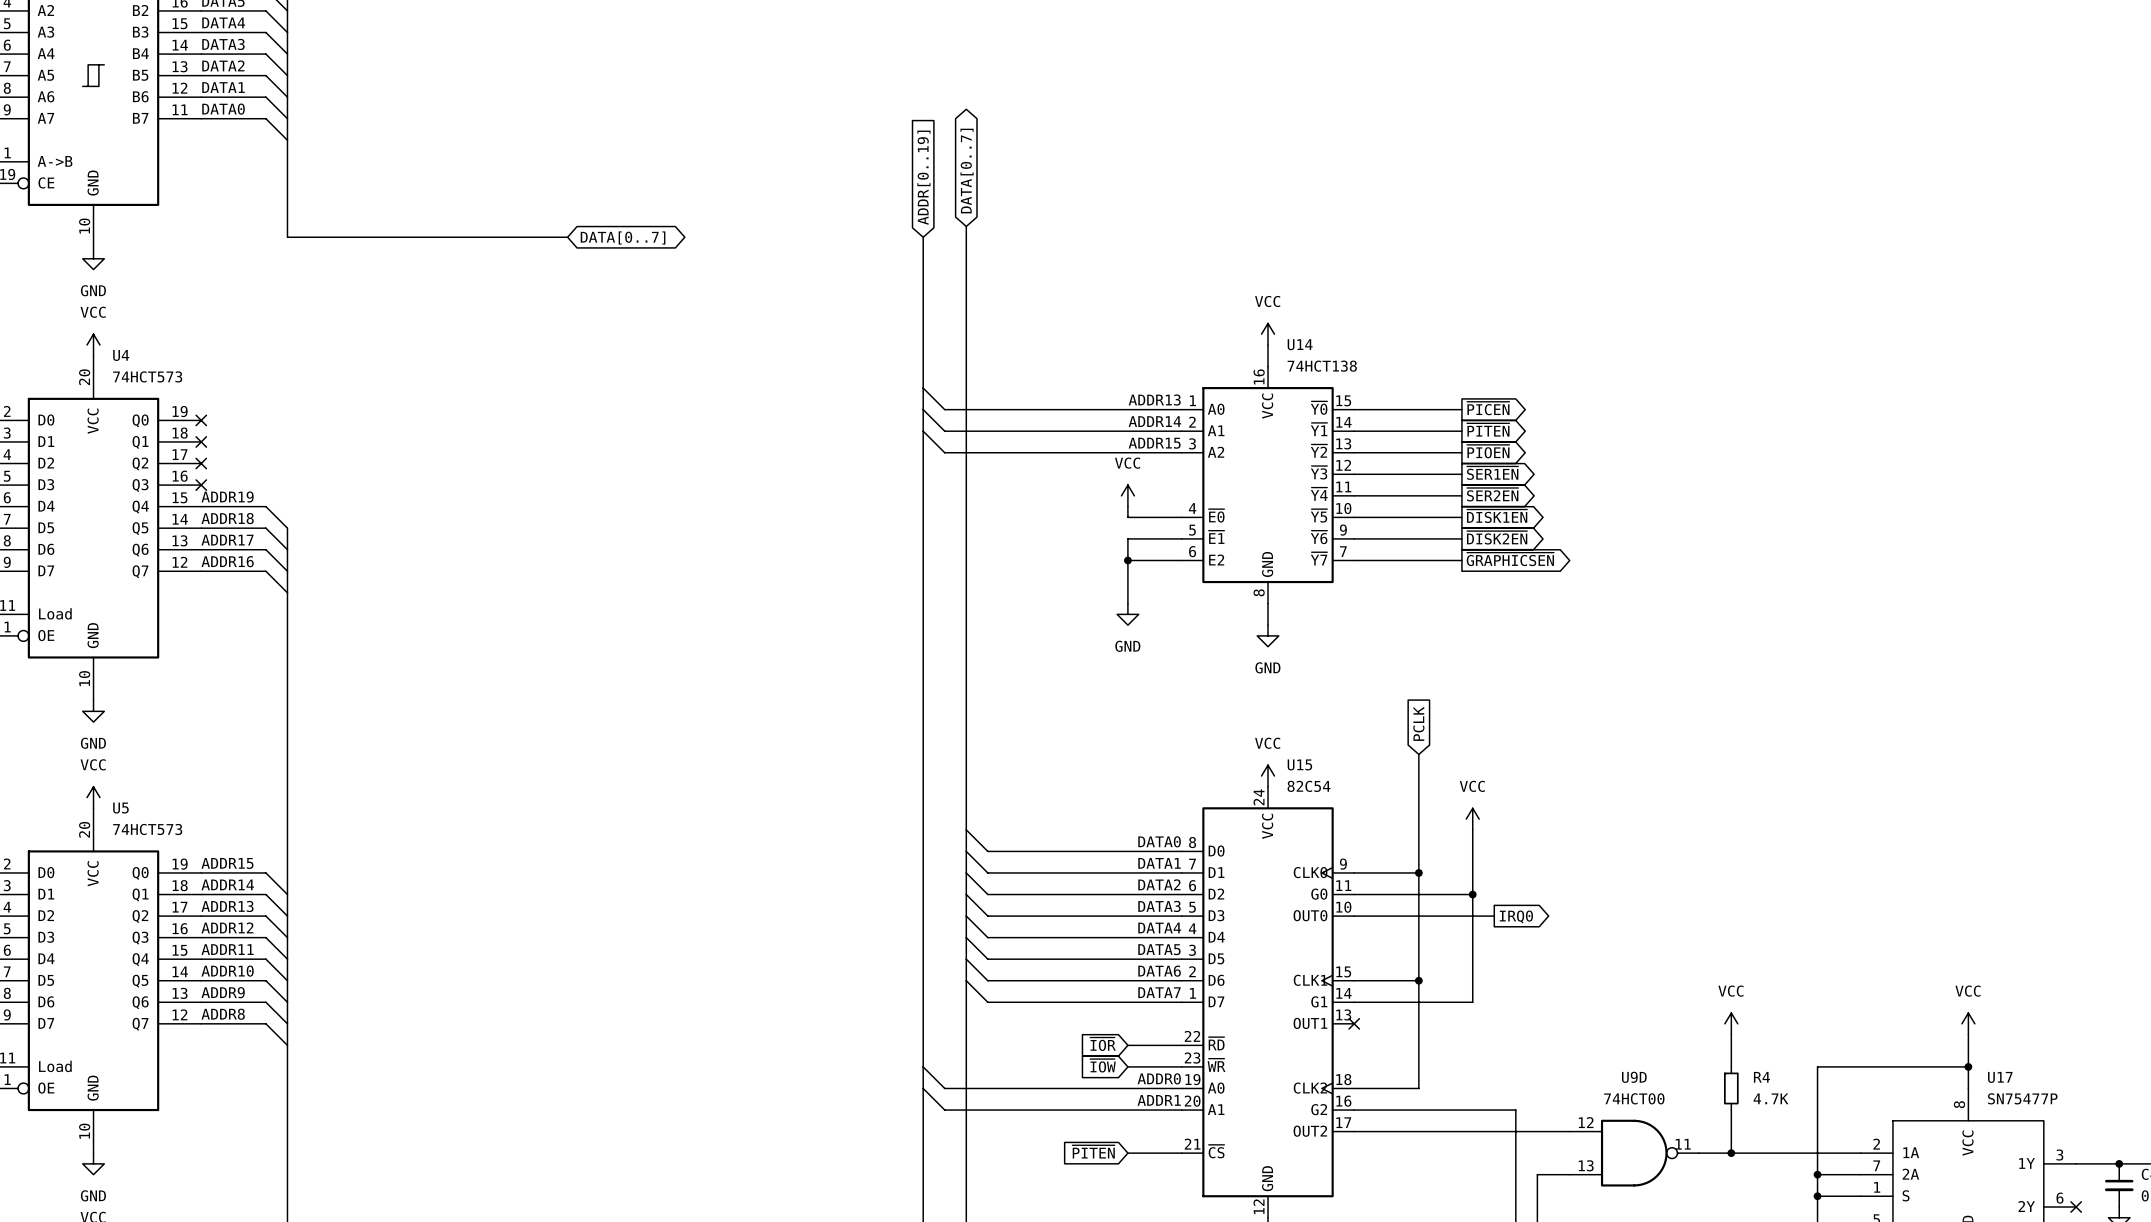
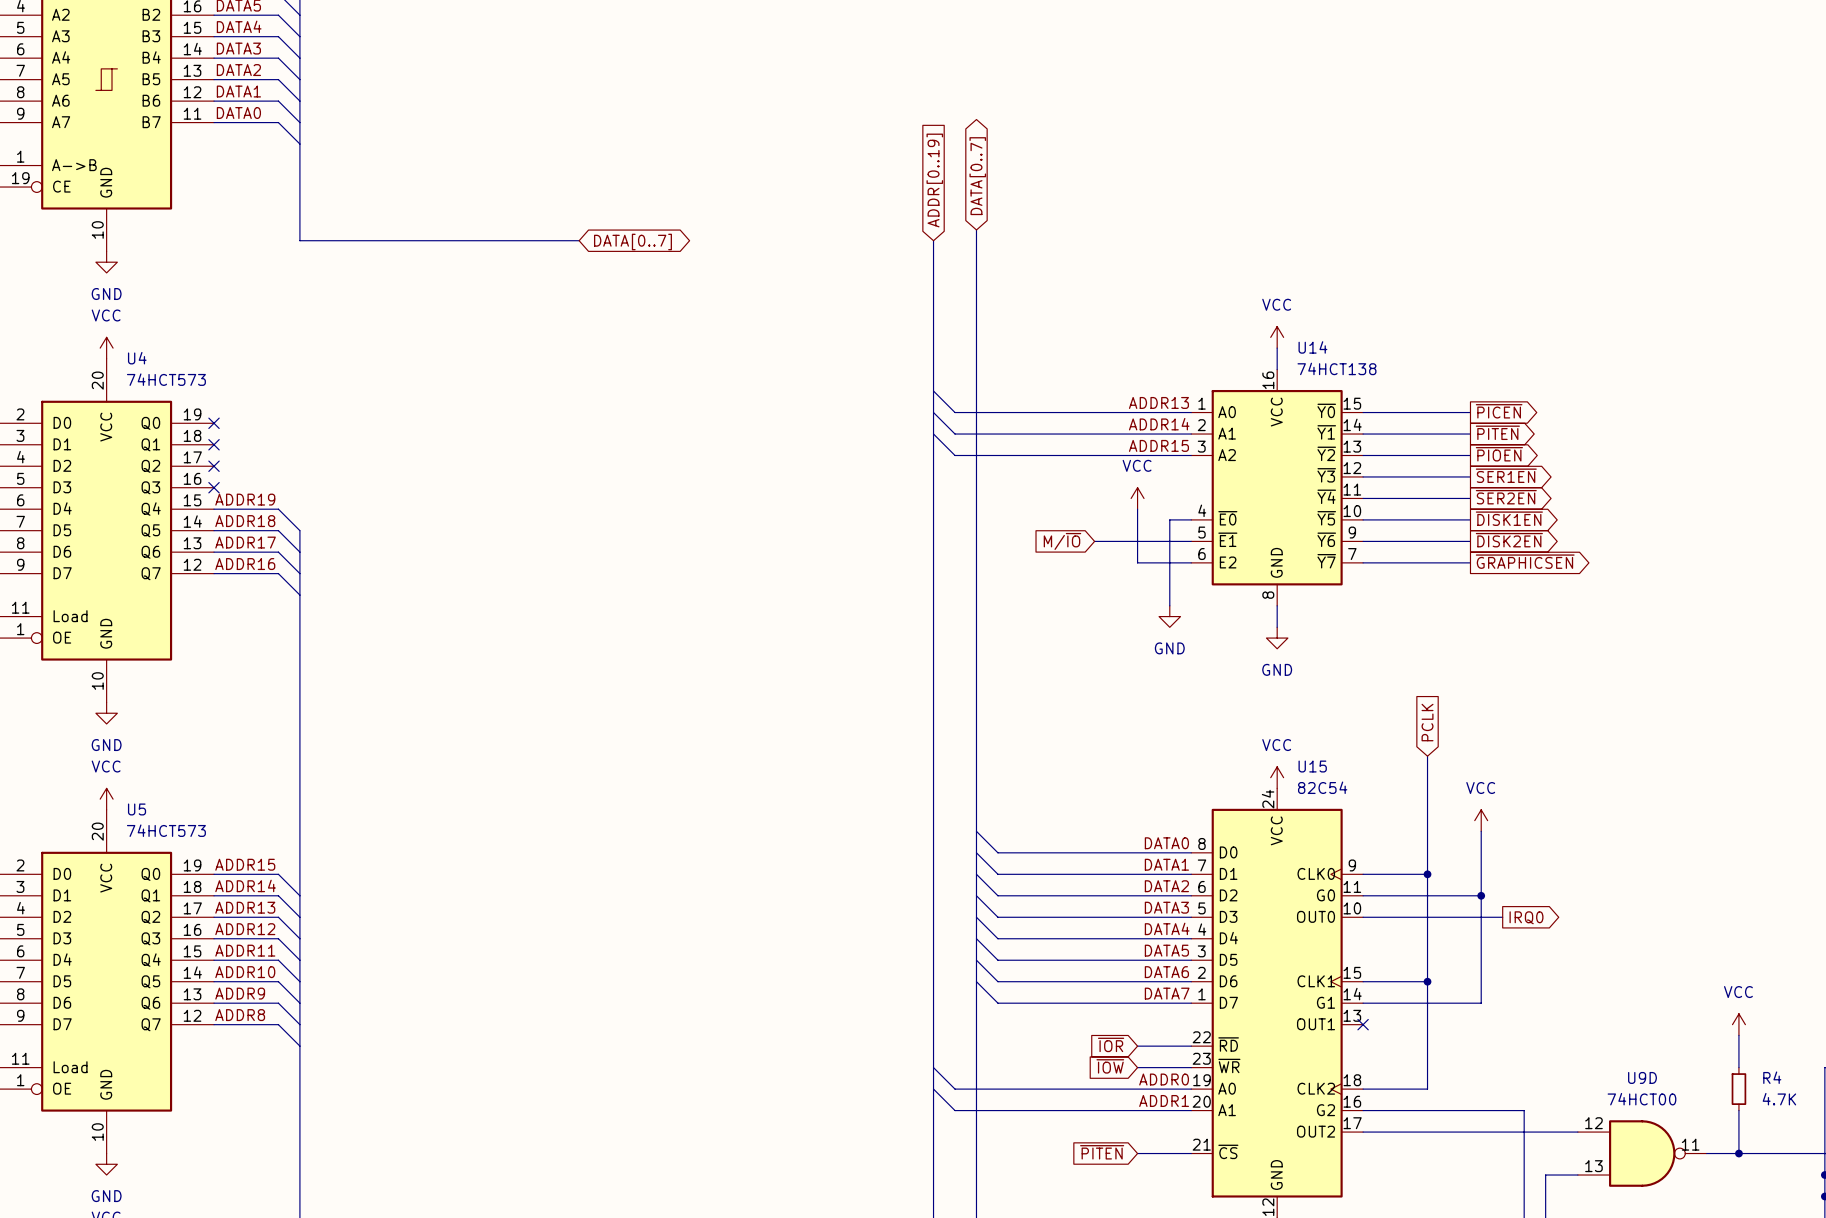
wire: (1127, 517) (1160, 517) -> (1137, 519) (1137, 541) (1094, 541)
wire: none -> (1169, 519) (1169, 605)
global label: none -> M/~{IO} (1062, 541)
wire: (1127, 560) (1127, 603) -> none
junction: (1127, 560) -> none
power symbol position: GND (1127, 614) -> GND (1169, 616)

